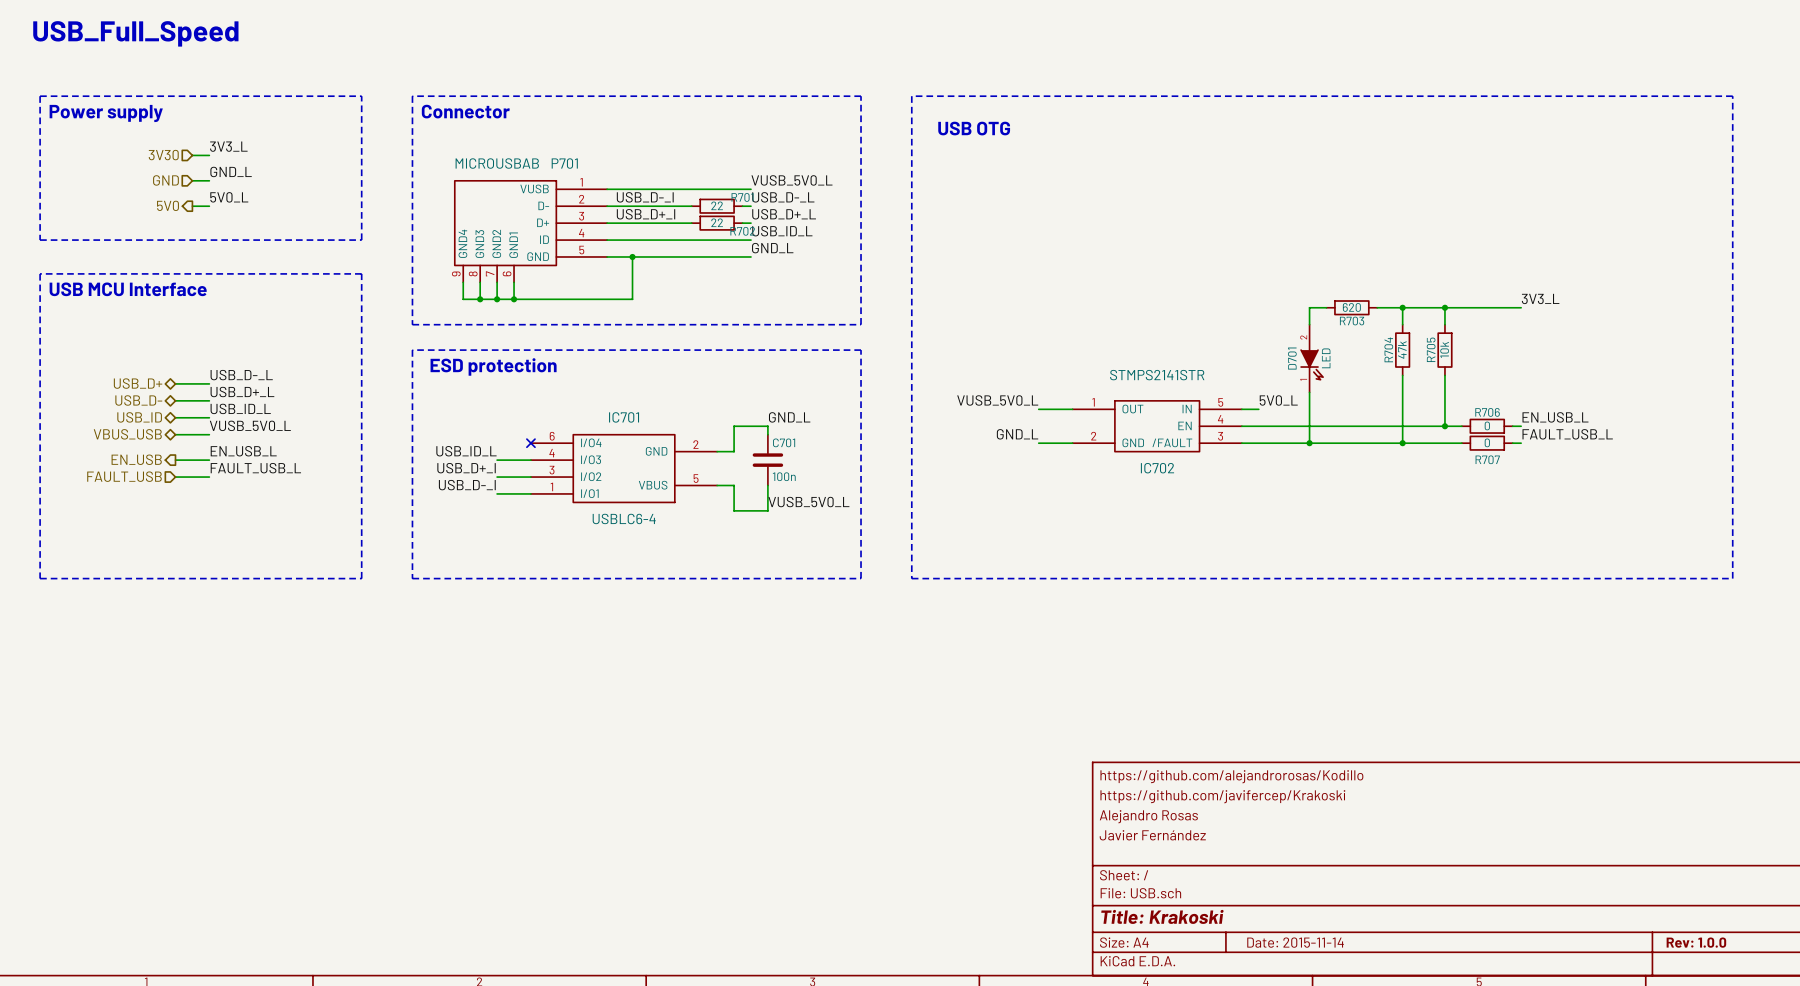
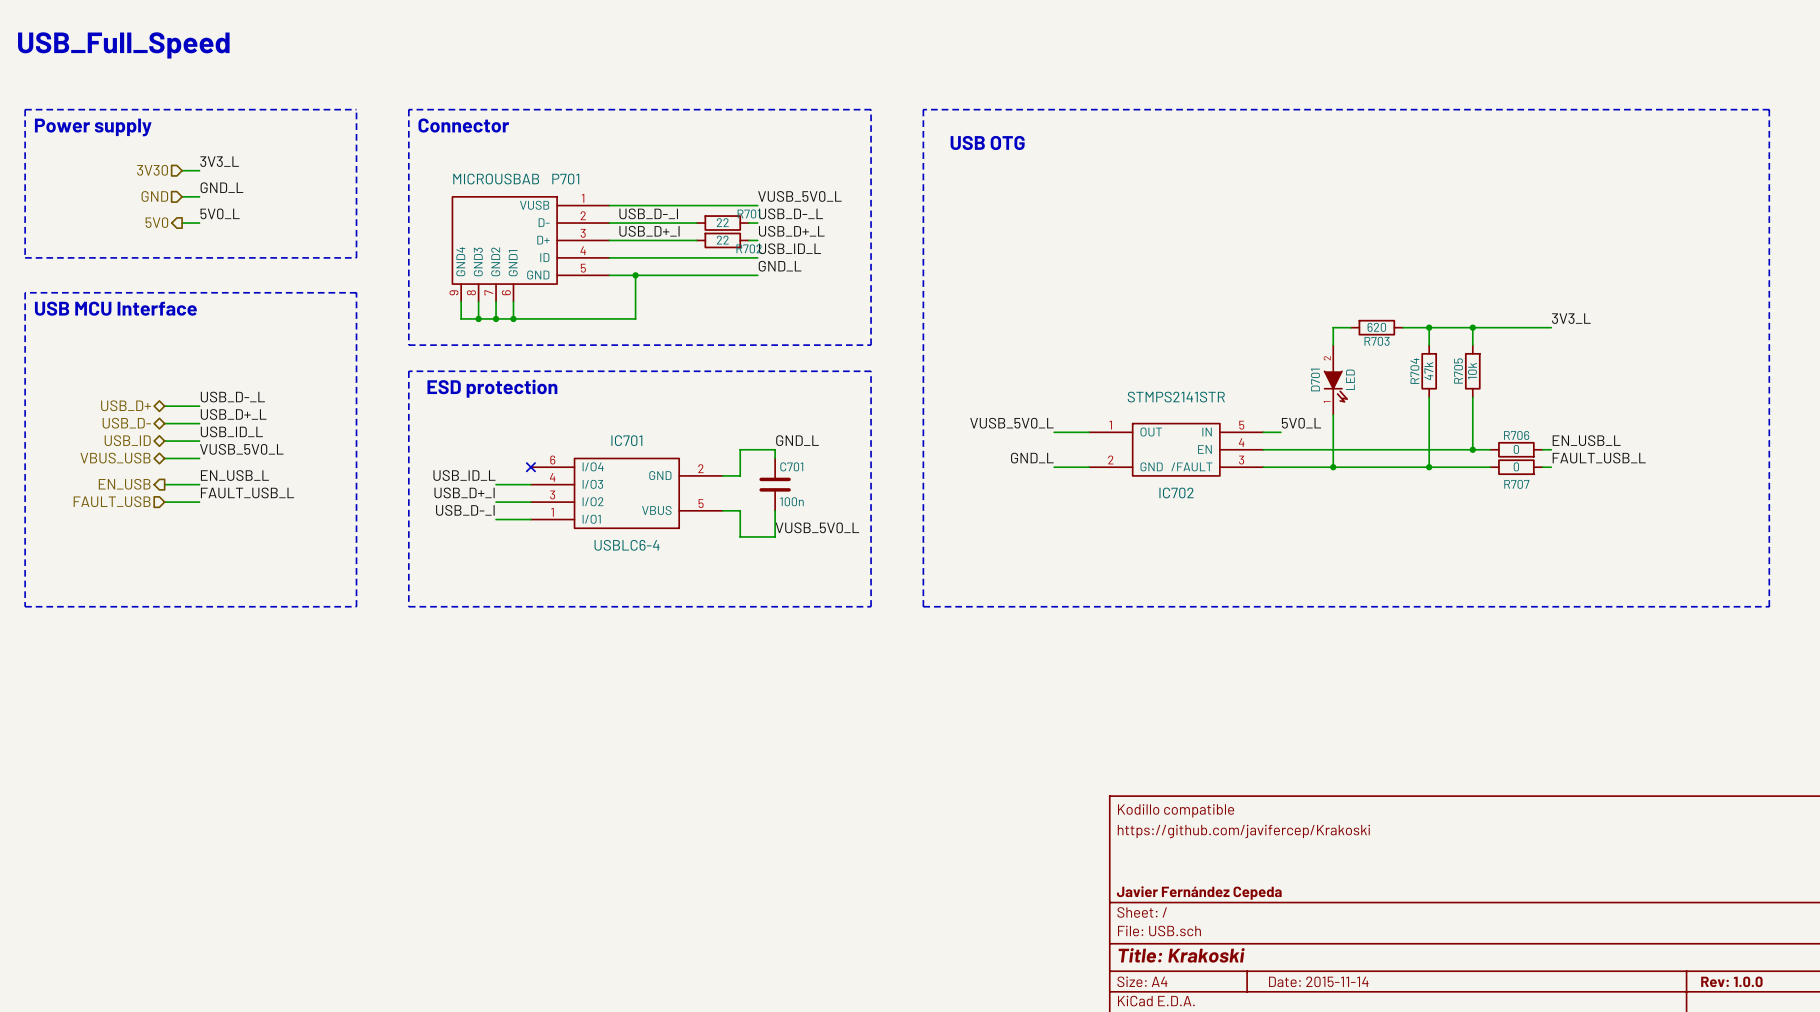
title block: https://github.com/alejandrorosas/Kodillo (1231, 776) -> Kodillo compatible (1176, 810)
title block: Alejandro Rosas (1148, 816) -> none
title block: Javier Fernández (1152, 835) -> Javier Fernández Cepeda (1199, 893)

